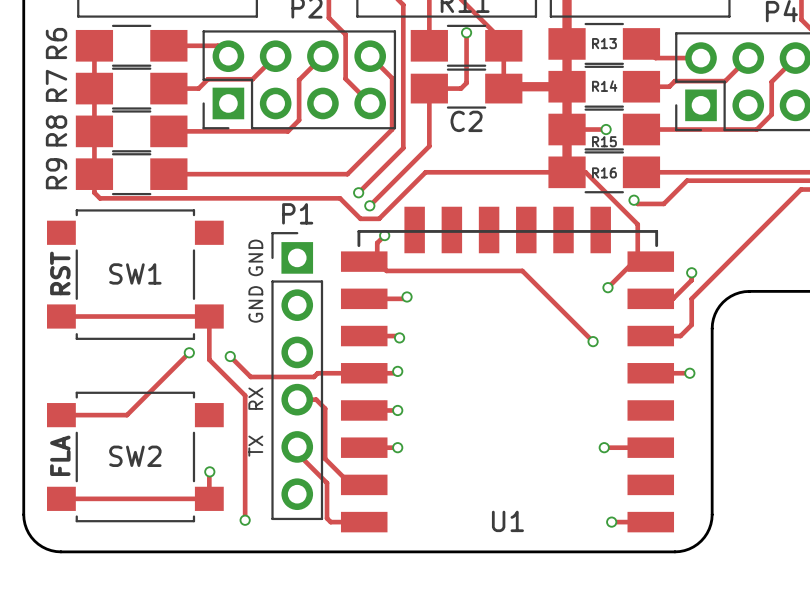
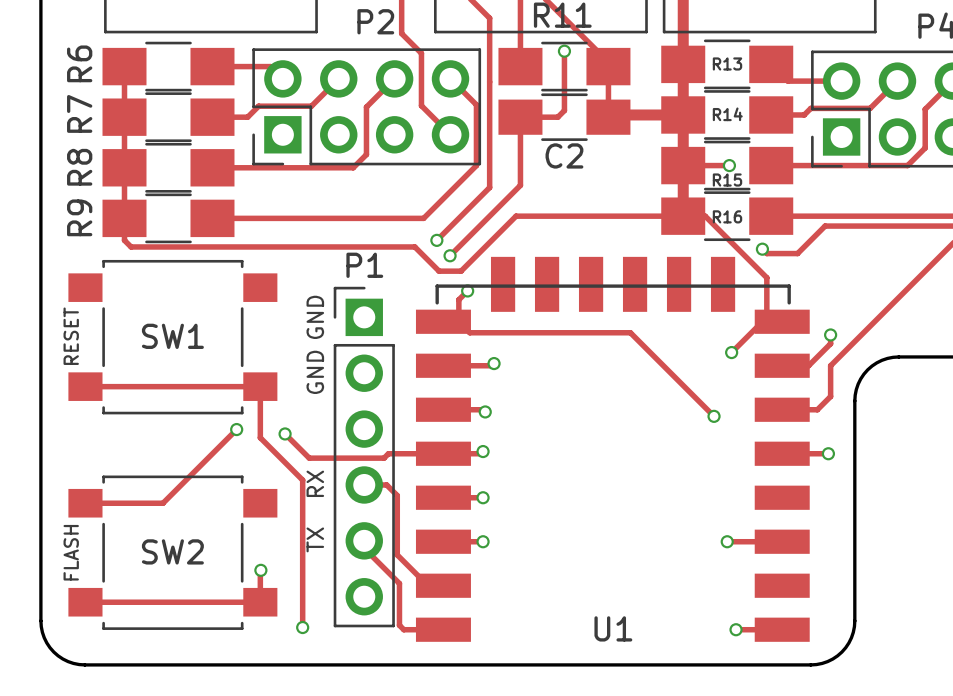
text: RST (60, 273) -> RESET (71, 336)
text: FLA (60, 455) -> FLASH (71, 552)

